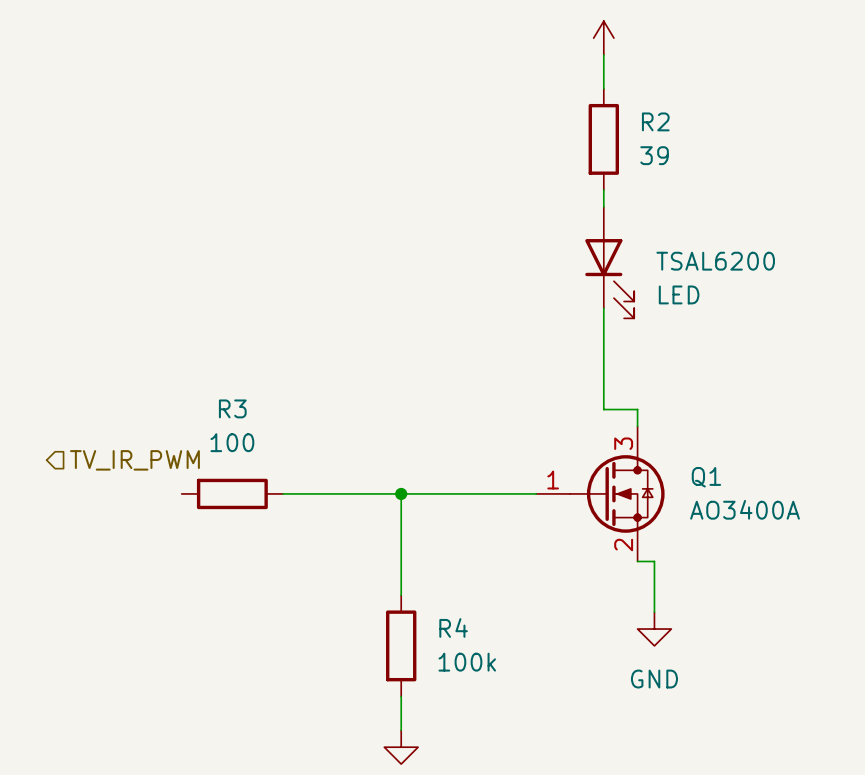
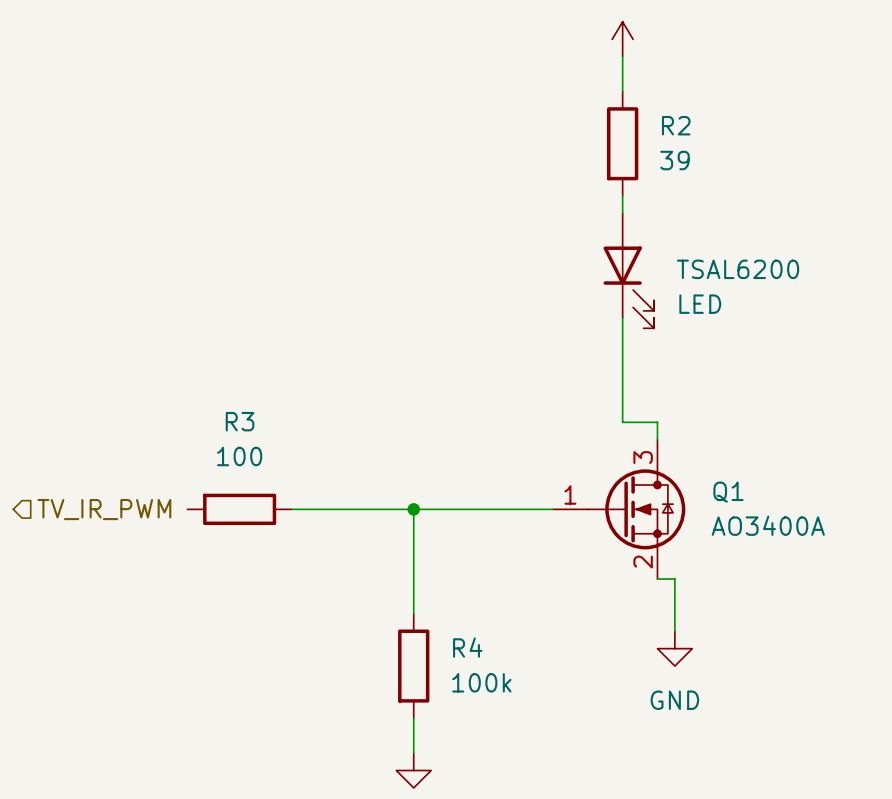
hierarchical label position: TV_IR_PWM (134, 460) -> TV_IR_PWM (104, 509)

